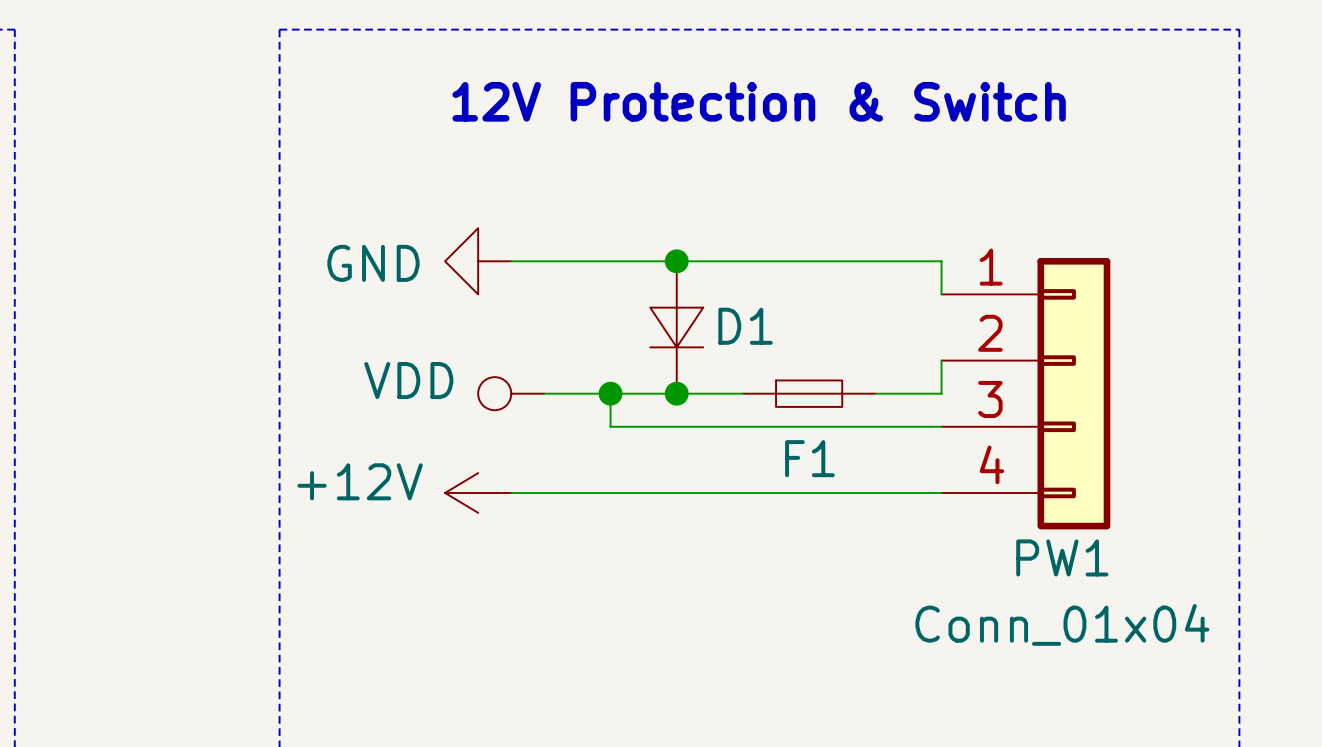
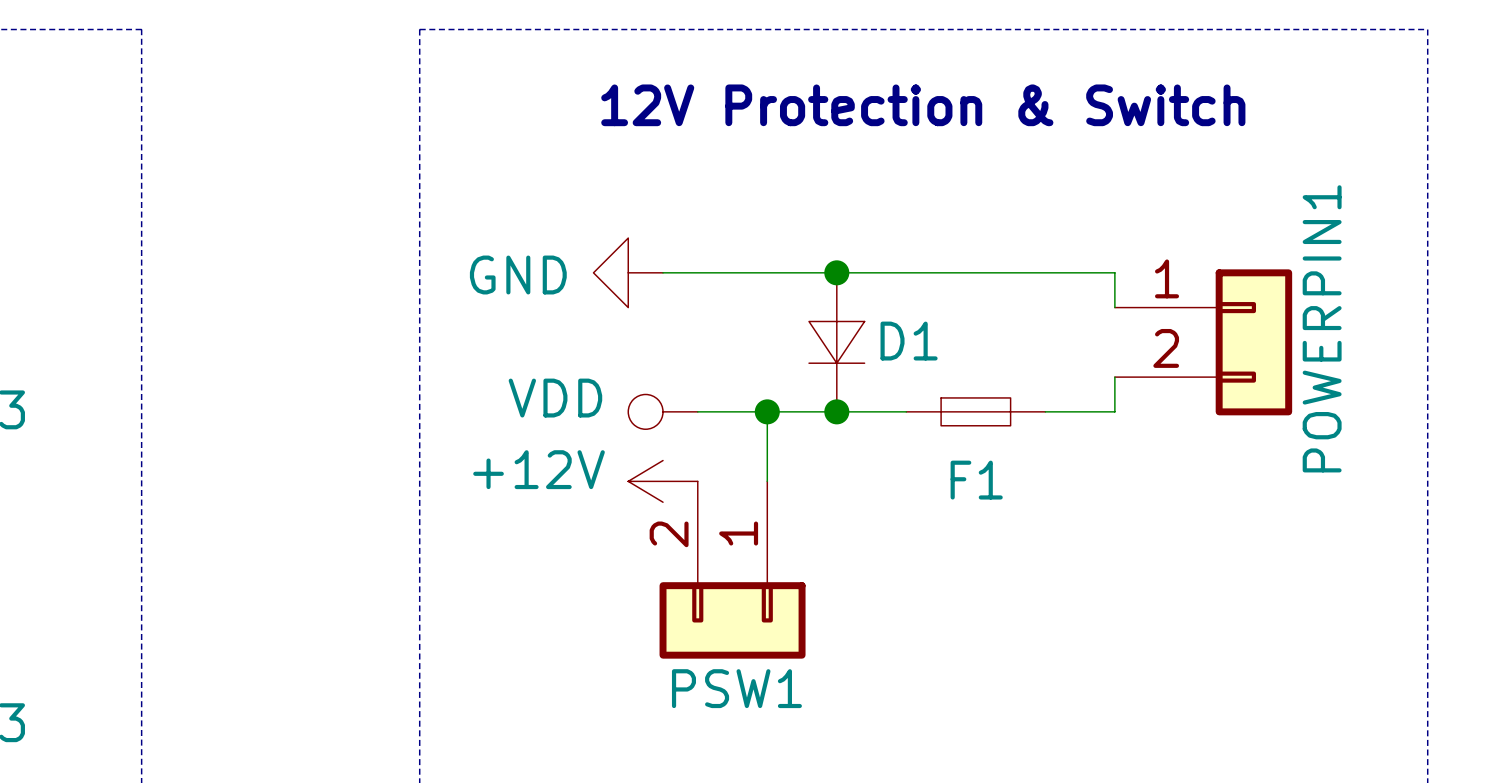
POWERPIN1: none -> (1203, 342)
PW1: Conn_01x04 (1025, 393) -> none
wire: (610, 426) (941, 426) -> (767, 446) (767, 481)
power symbol position: +12V (478, 492) -> +12V (663, 481)
wire: (511, 492) (941, 492) -> none
PSW1: none -> (732, 570)

